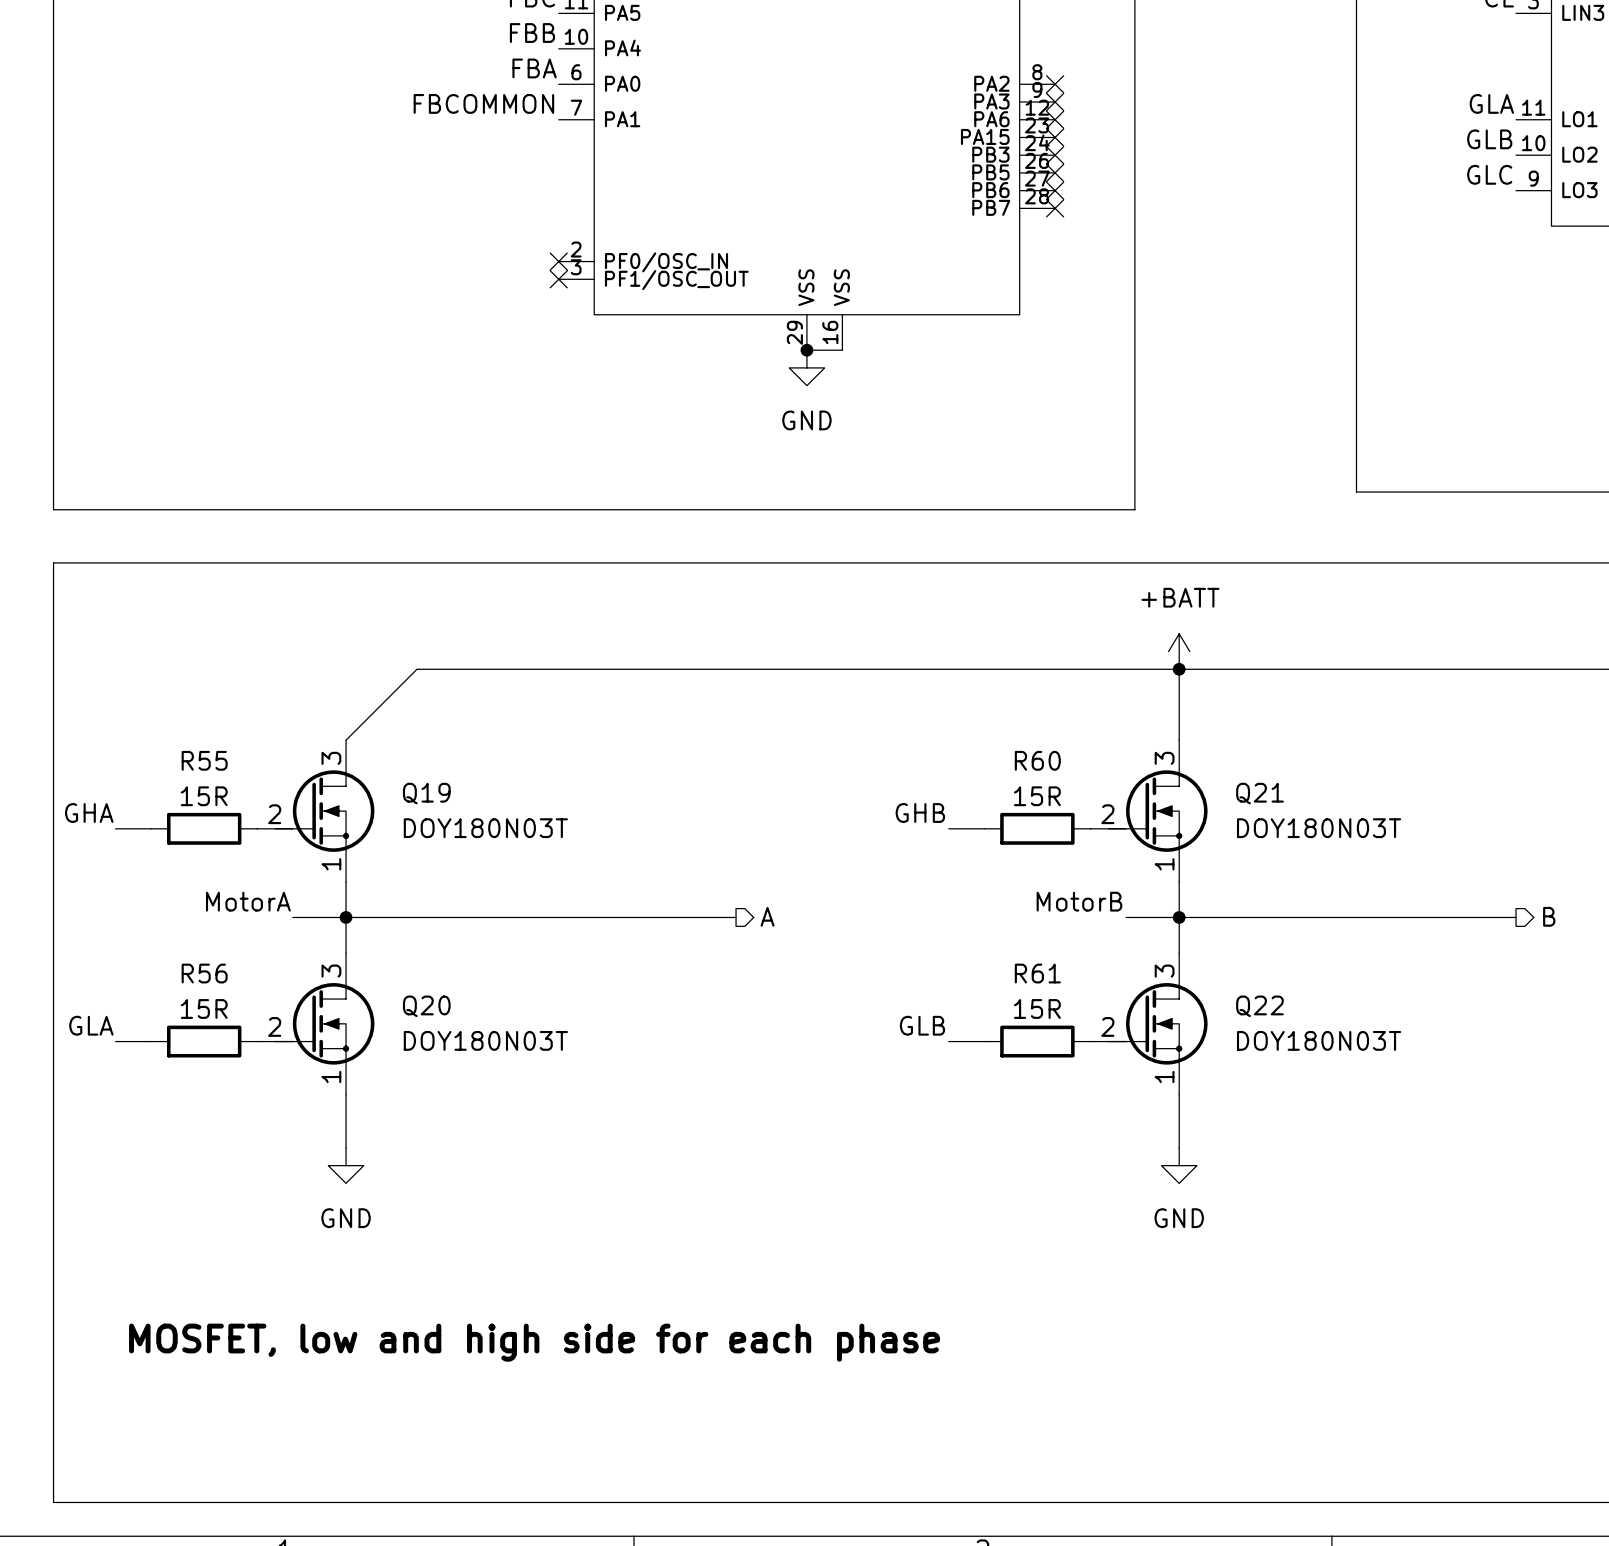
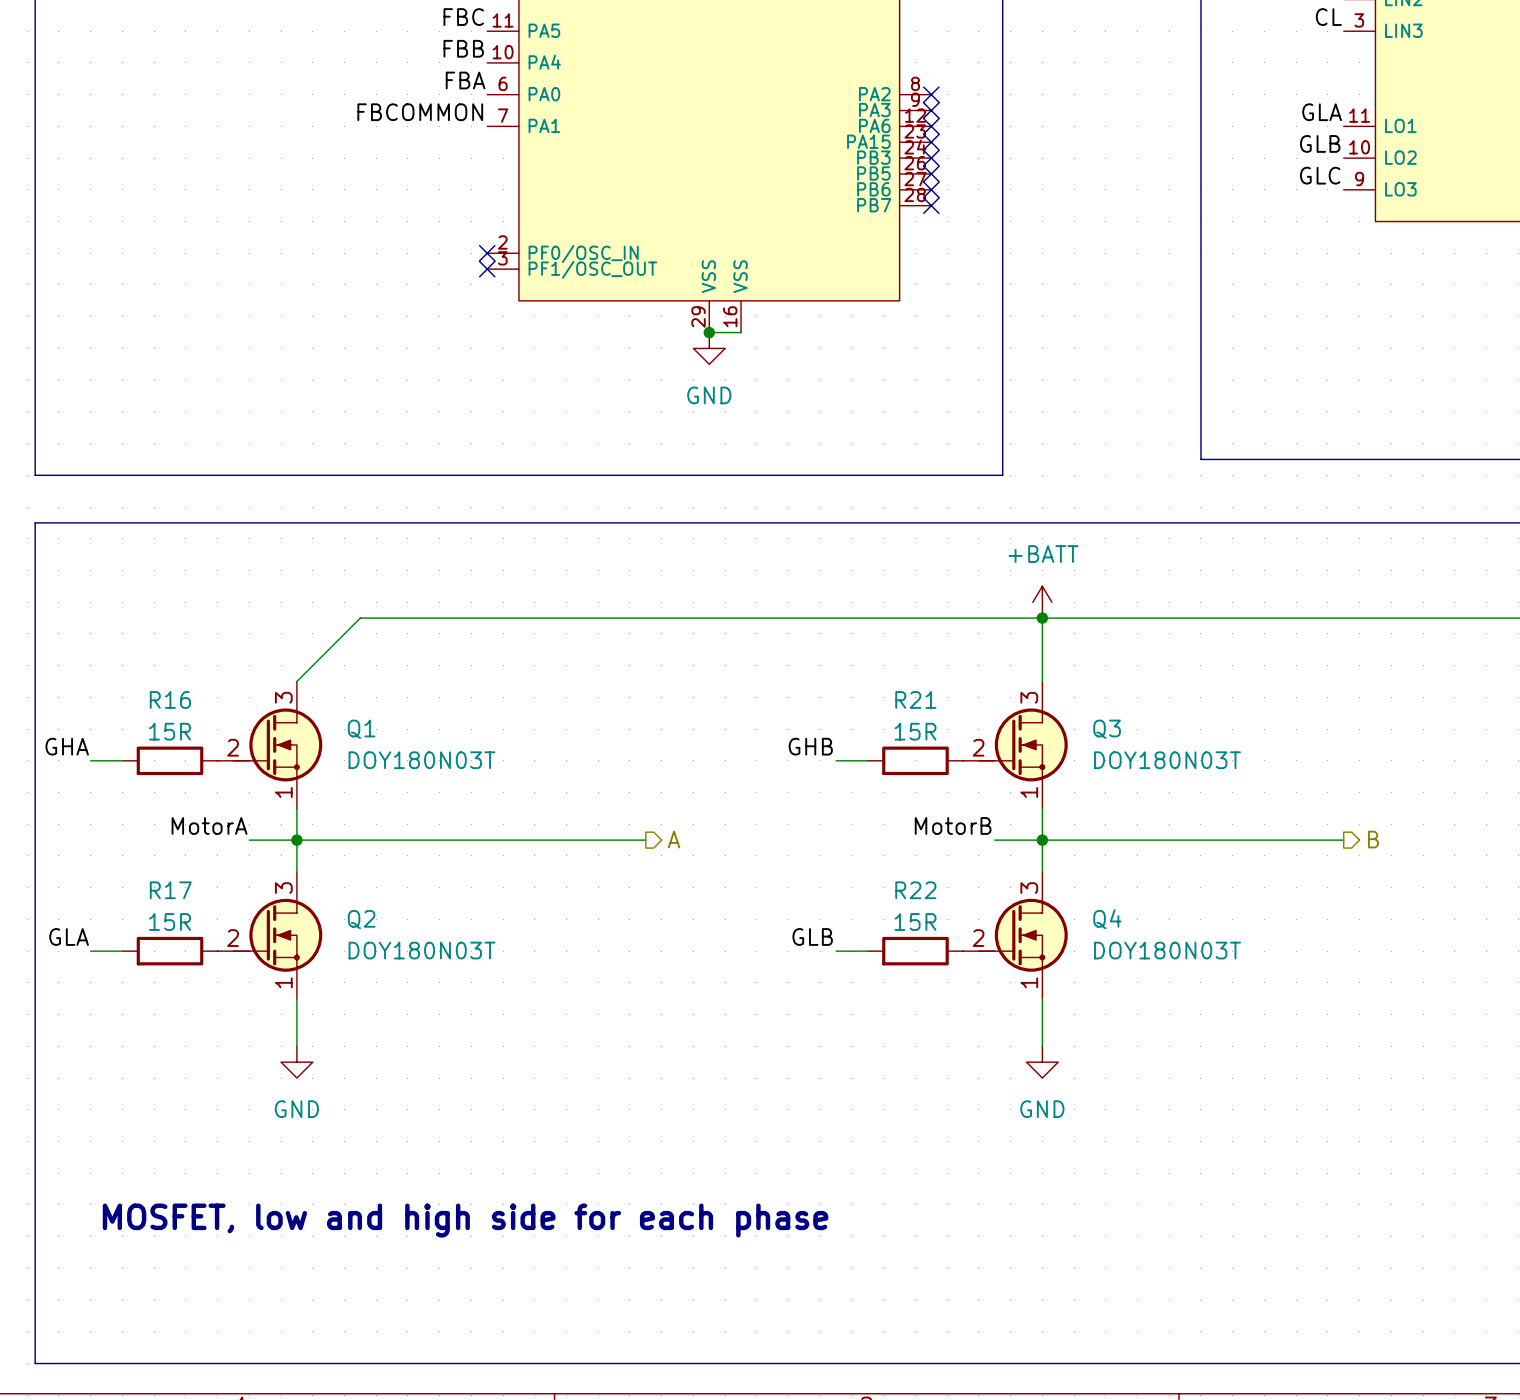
R55 name: R55 (204, 760) -> R16 (170, 699)
R60 name: R60 (1037, 760) -> R21 (915, 699)
Q19 name: Q19 (426, 793) -> Q1 (361, 729)
Q21 name: Q21 (1259, 793) -> Q3 (1107, 729)
R56 name: R56 (204, 973) -> R17 (170, 890)
R61 name: R61 (1037, 973) -> R22 (915, 890)
Q20 name: Q20 (426, 1006) -> Q2 (361, 919)
Q22 name: Q22 (1259, 1006) -> Q4 (1107, 919)

